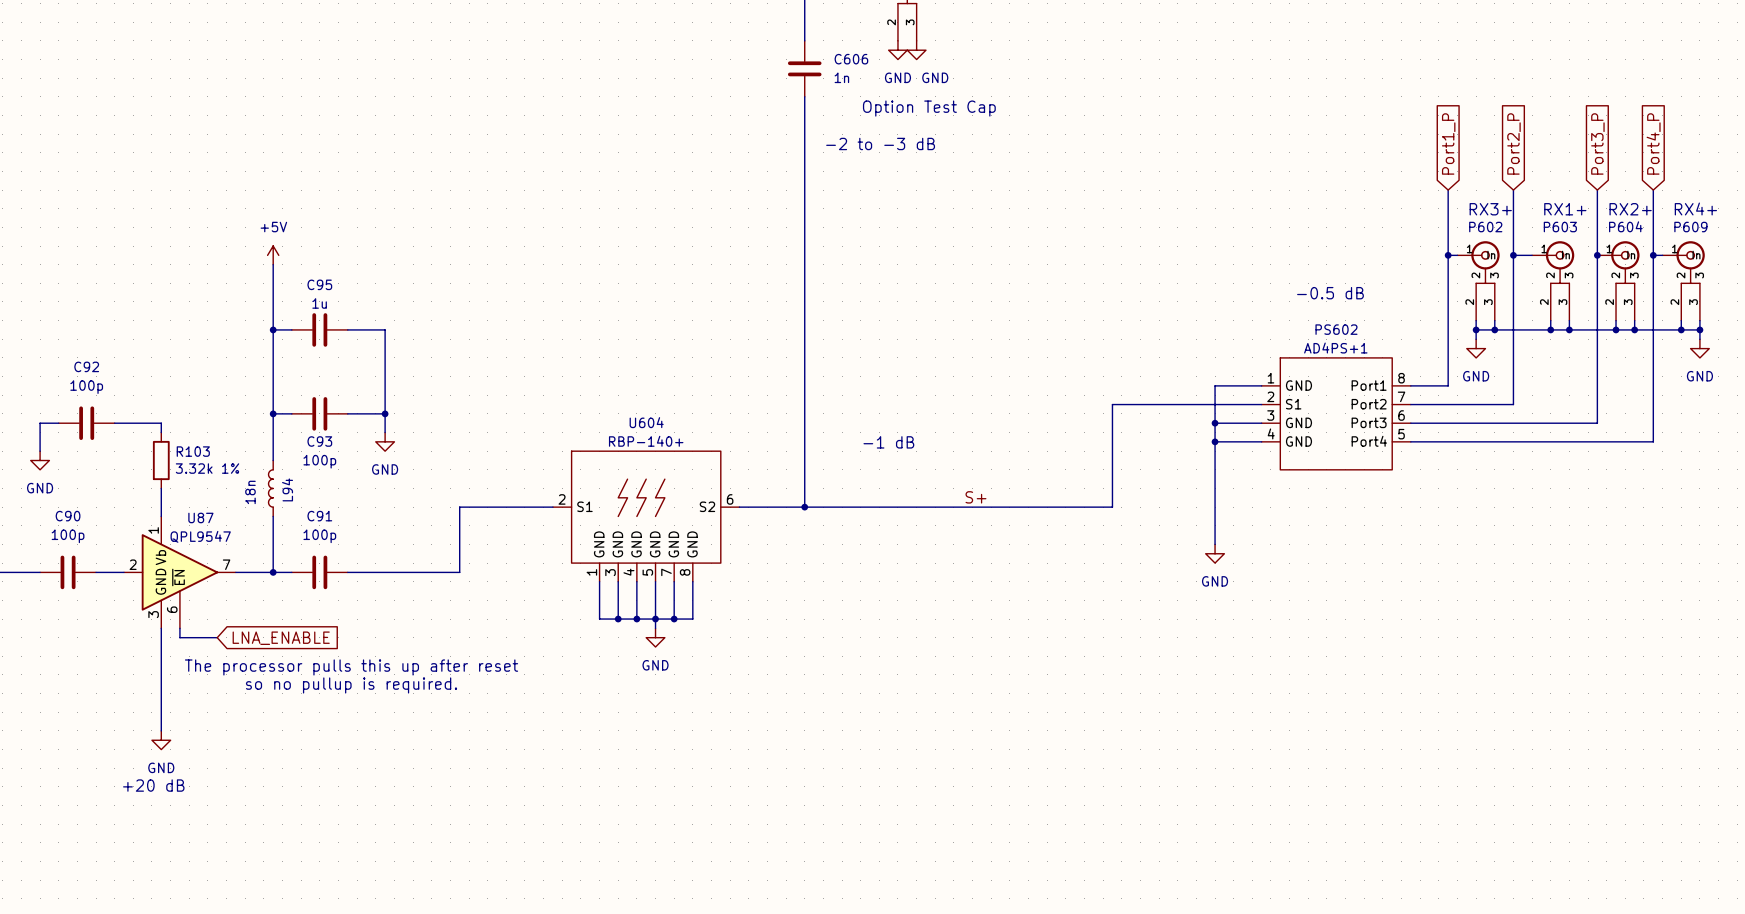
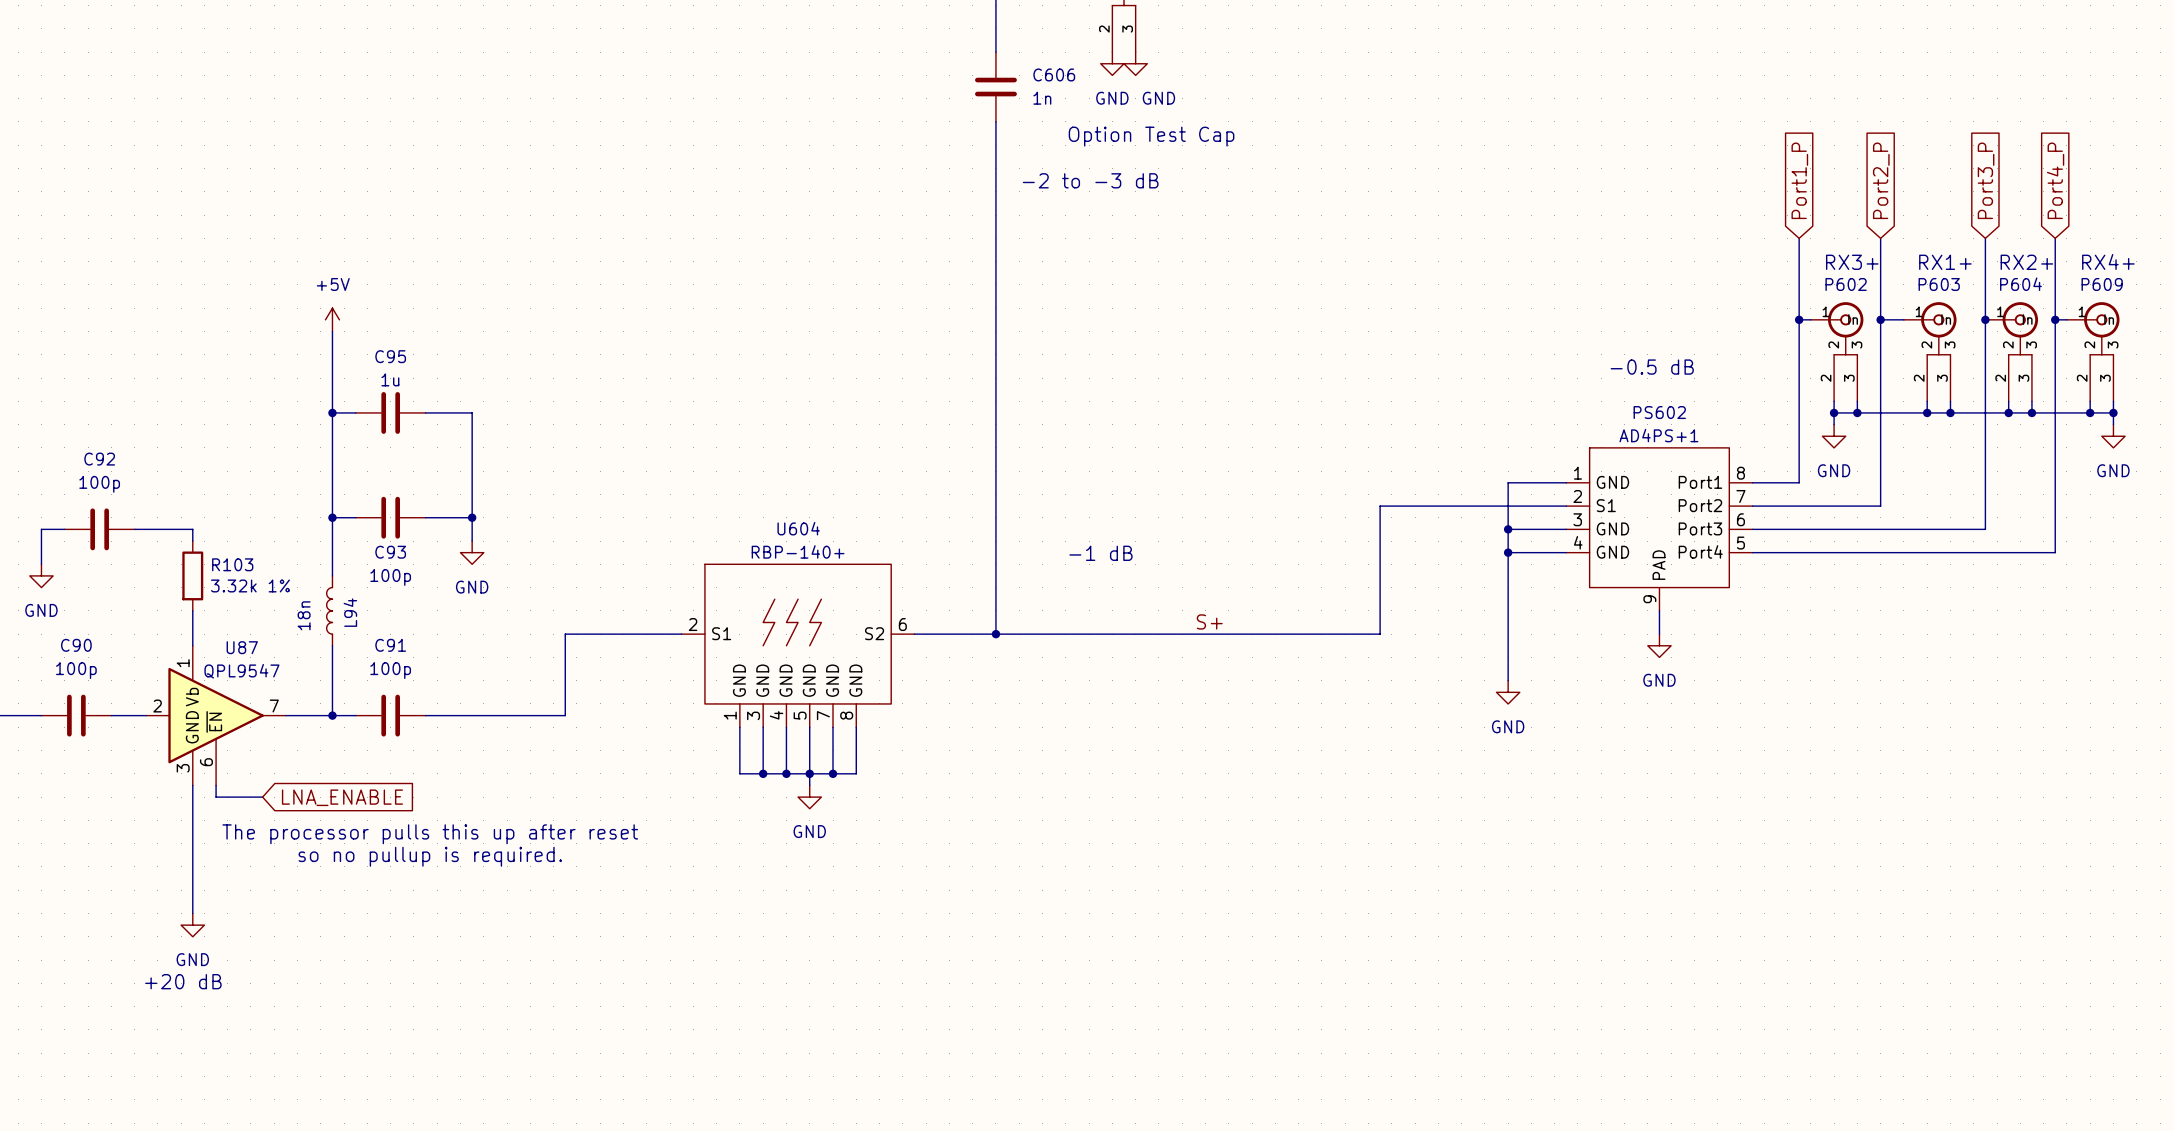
PS602 symbol: [1261, 357, 1411, 470] -> [1566, 447, 1753, 611]
wire: none -> (1659, 610) (1659, 634)
power symbol: none -> GND (1659, 645)

